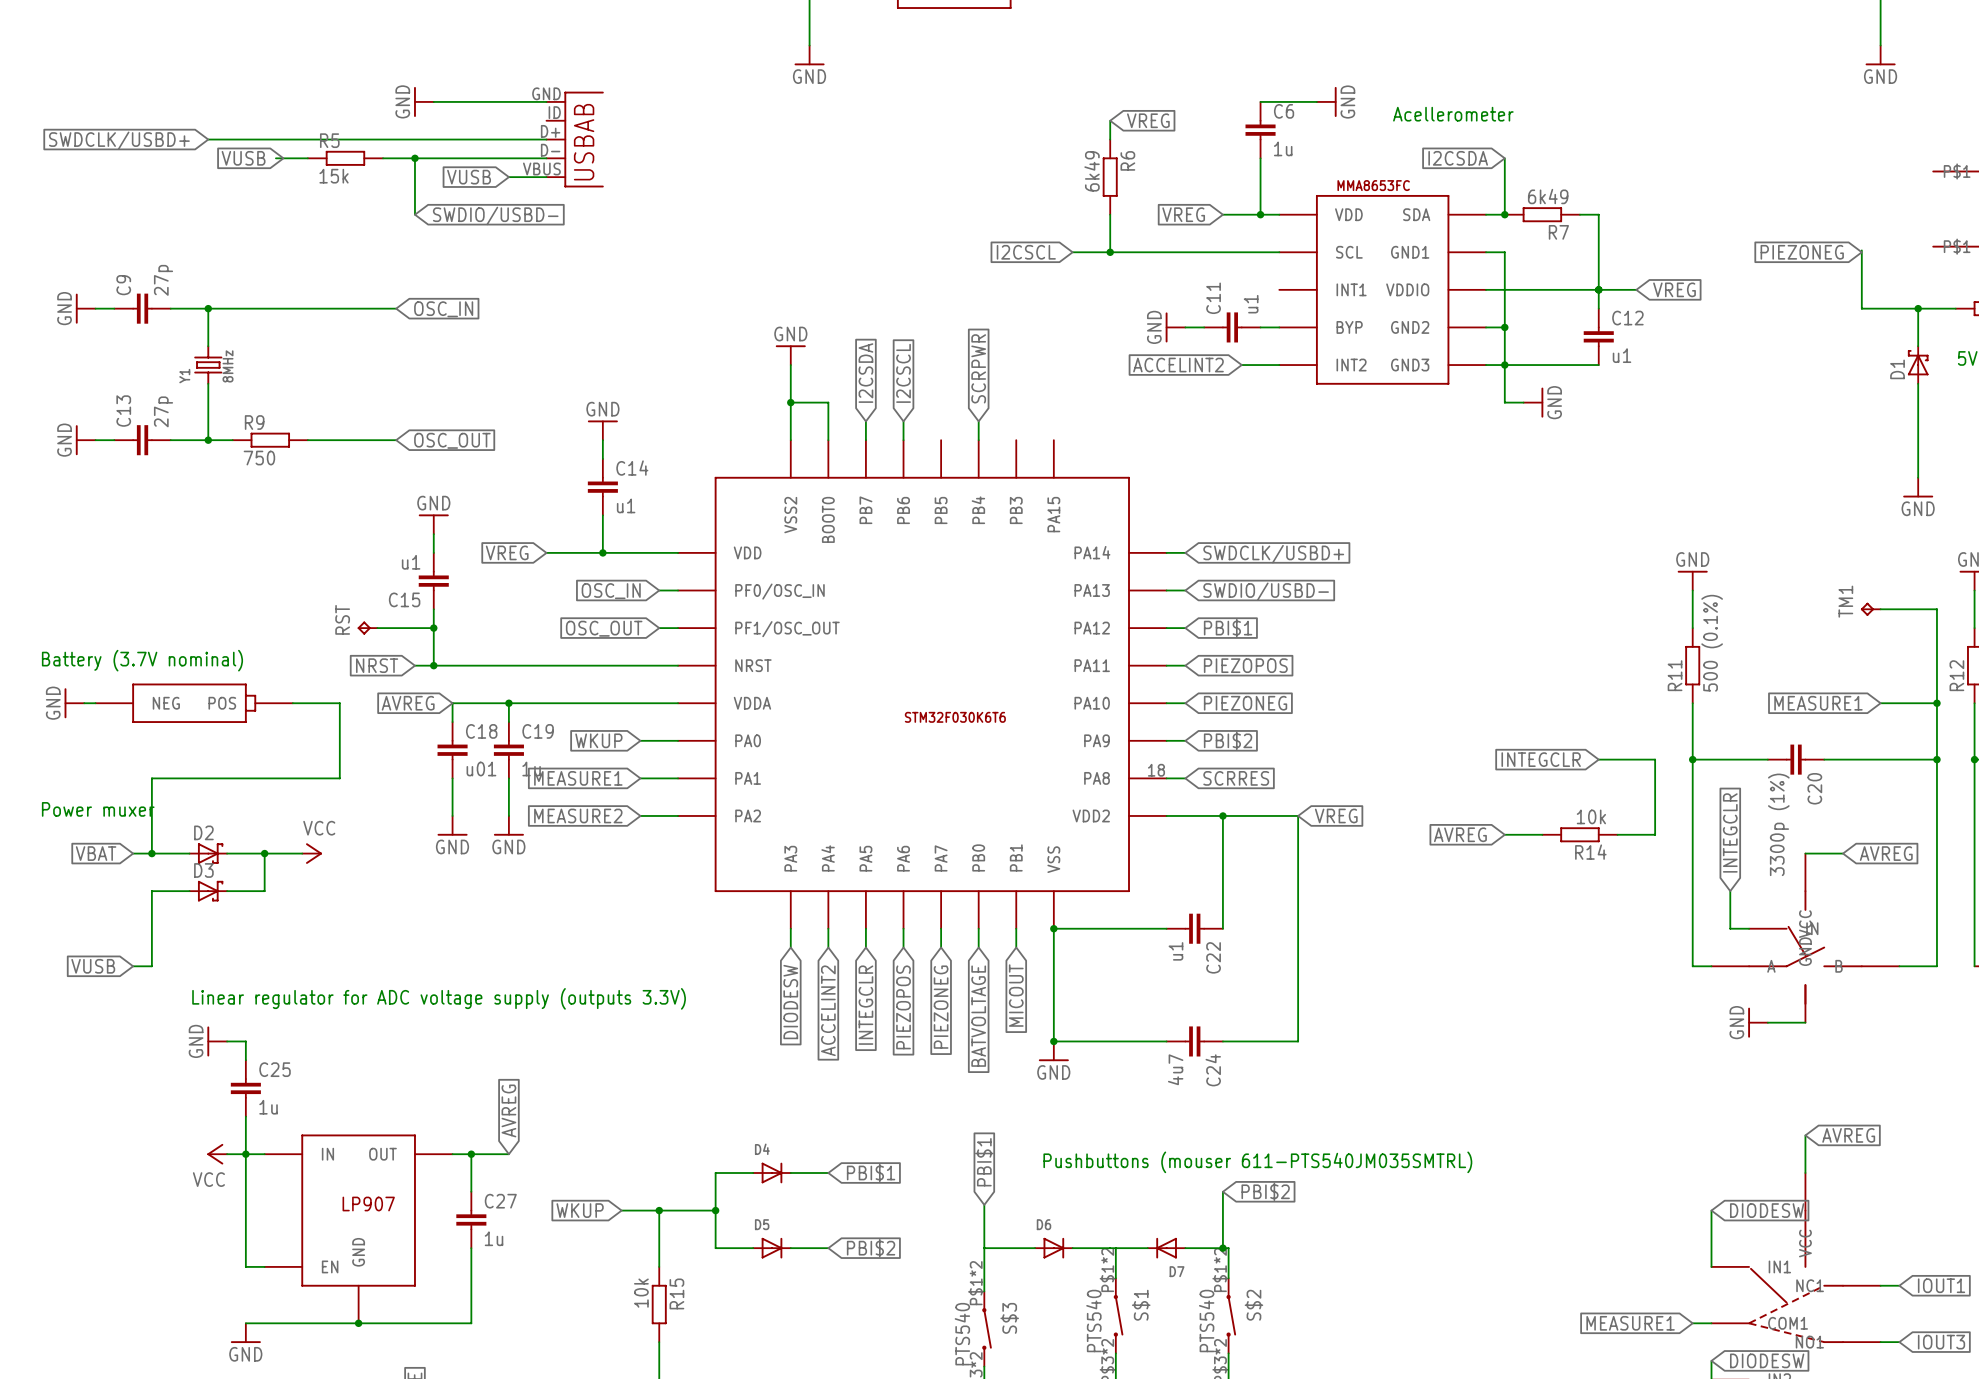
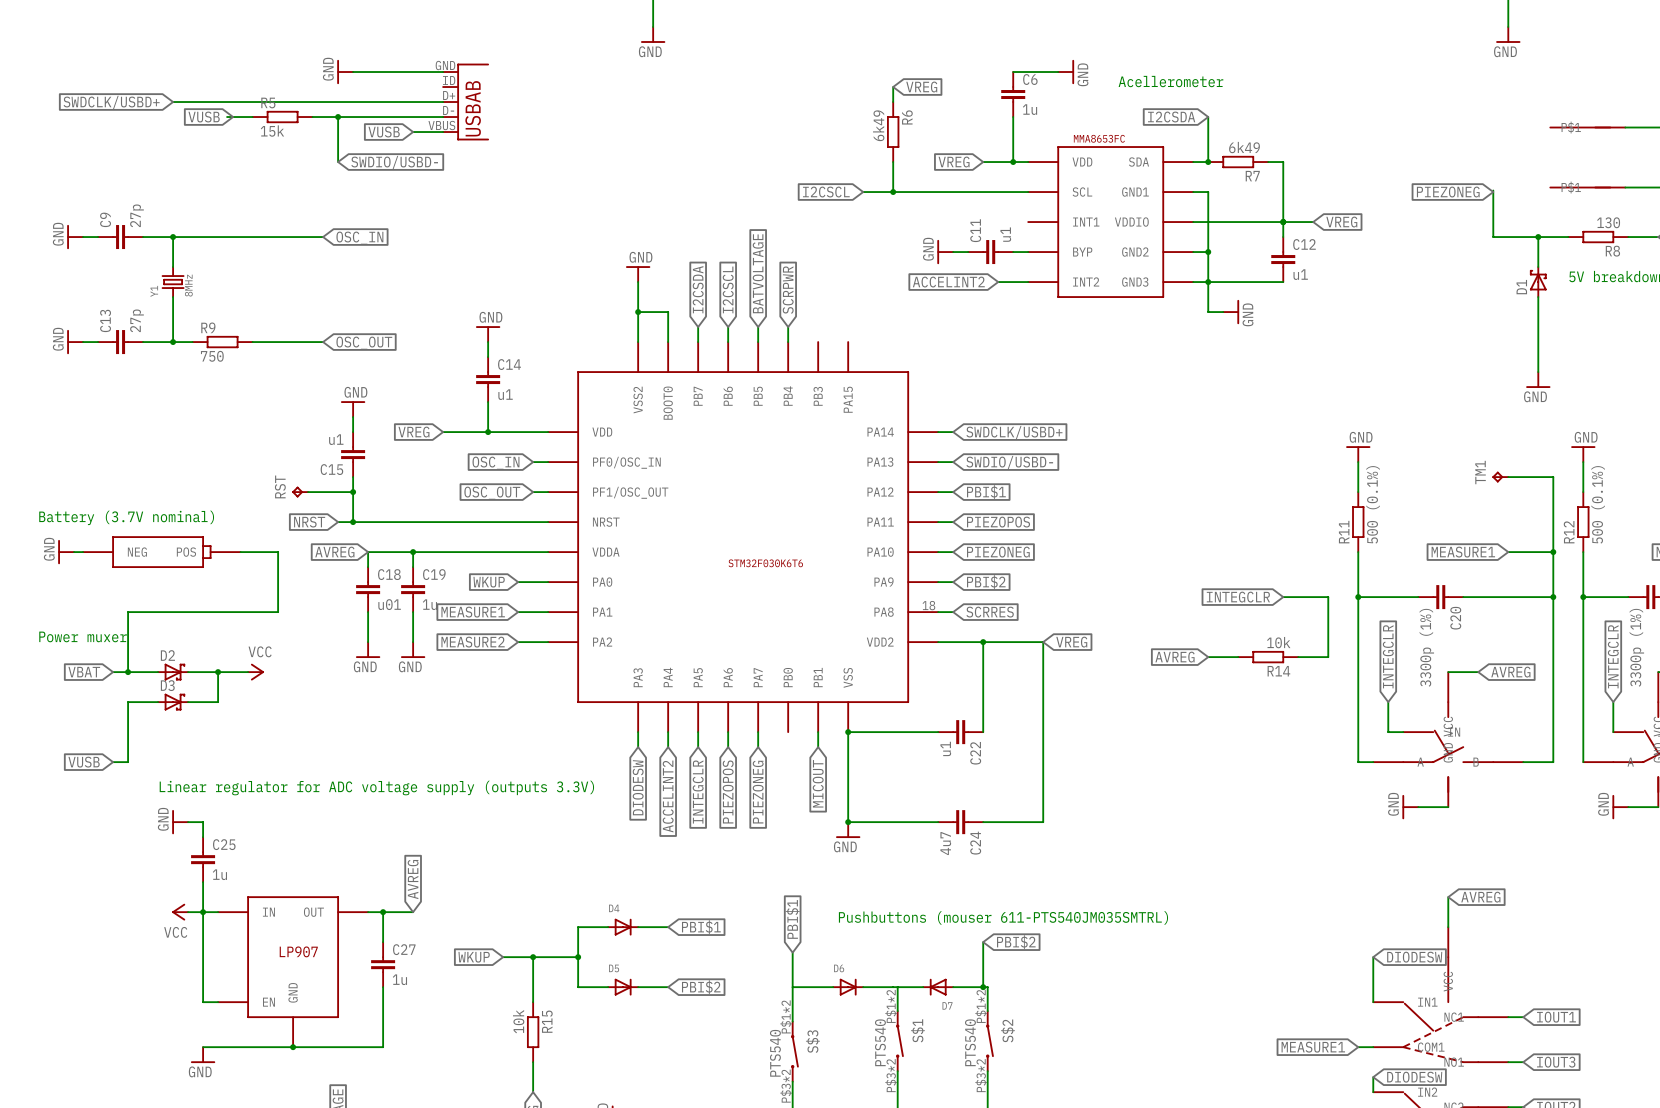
global label: none -> BATVOLTAGE (758, 273)
wire: none -> (758, 327) (758, 342)
wire: (978, 928) (978, 947) -> none
global label: BATVOLTAGE (978, 1016) -> none

